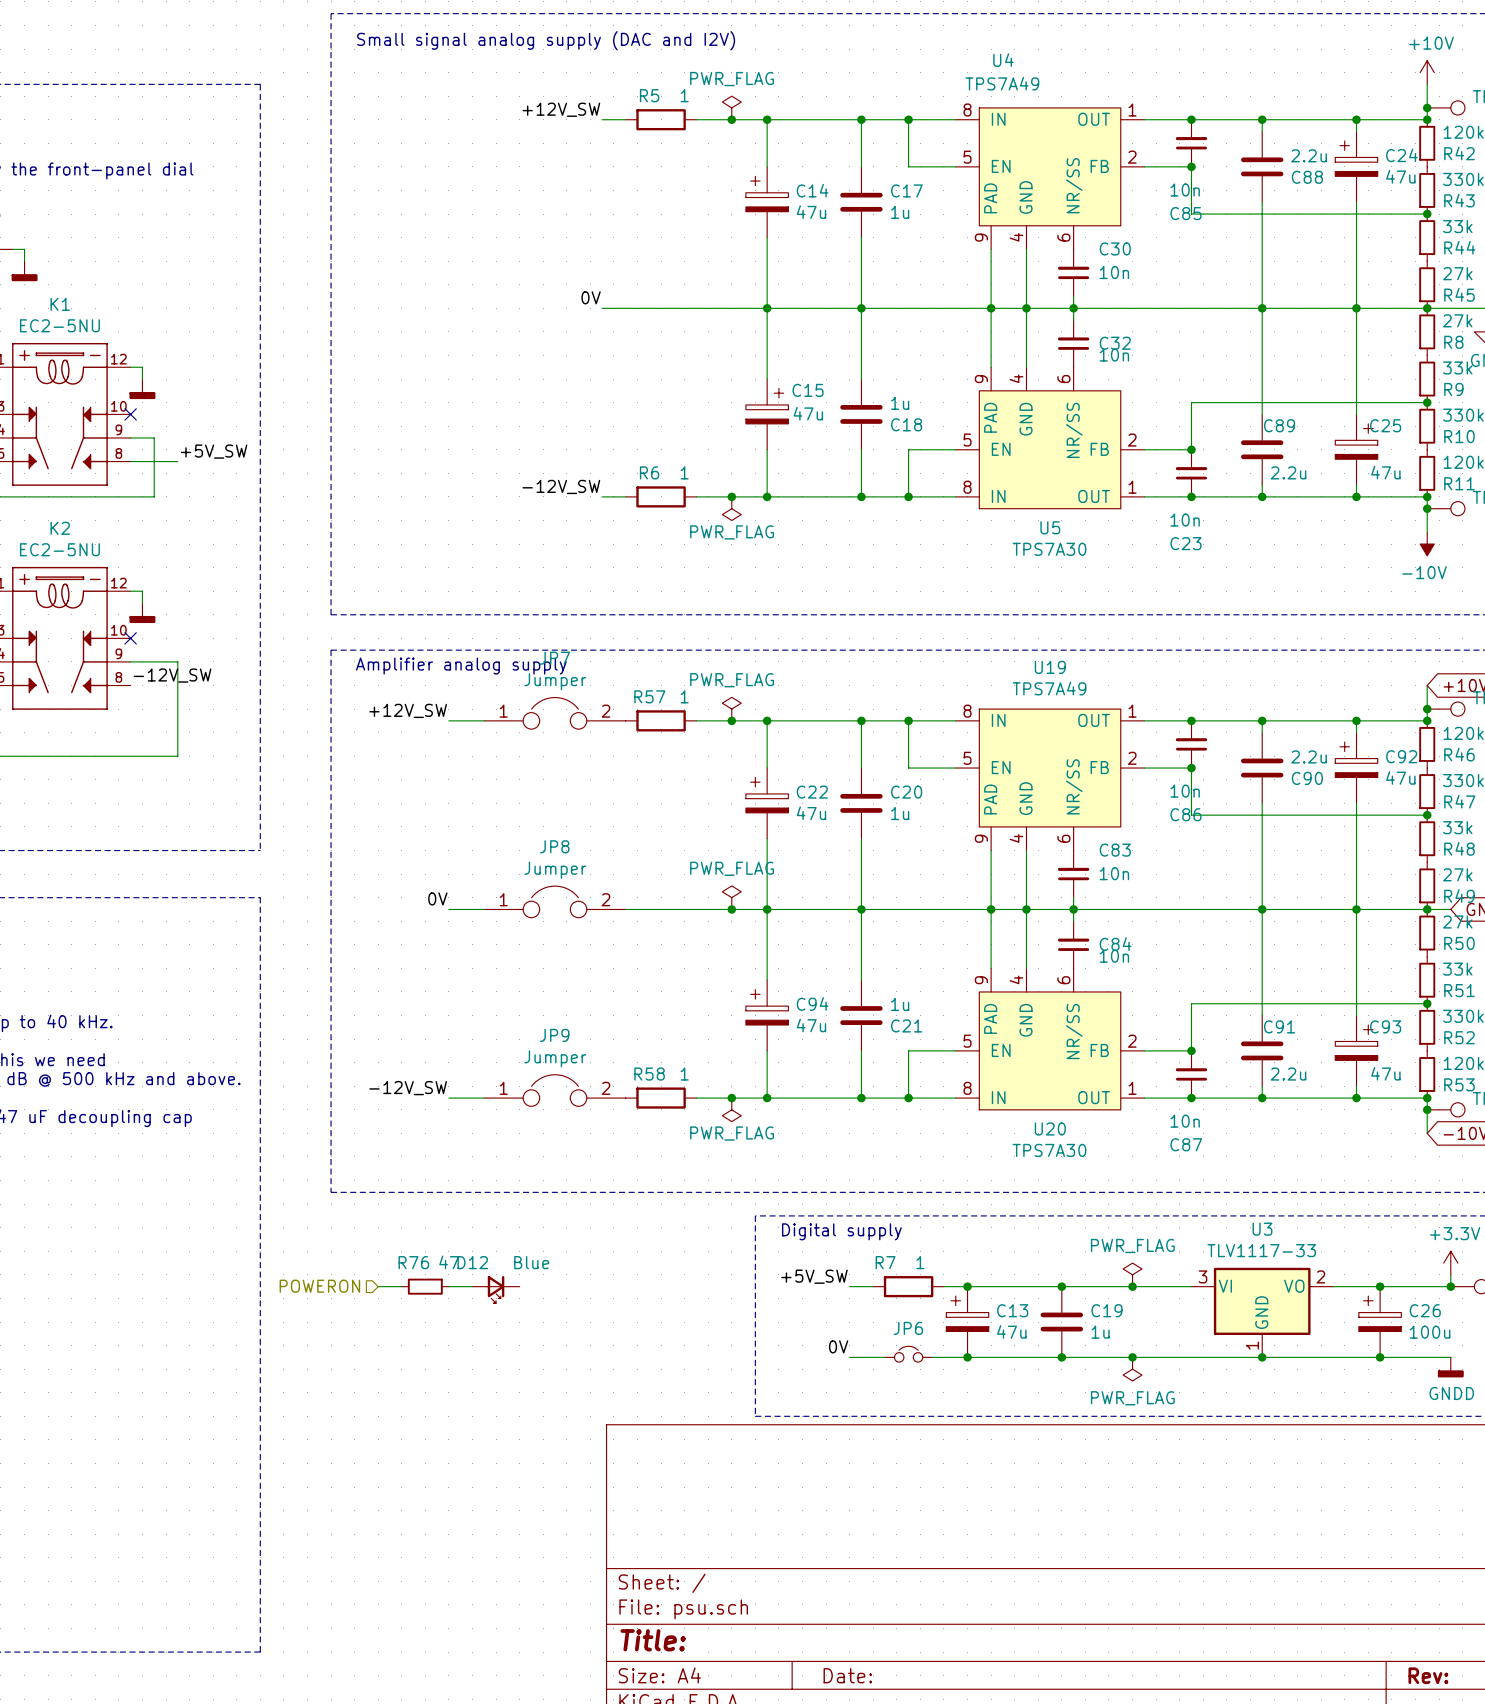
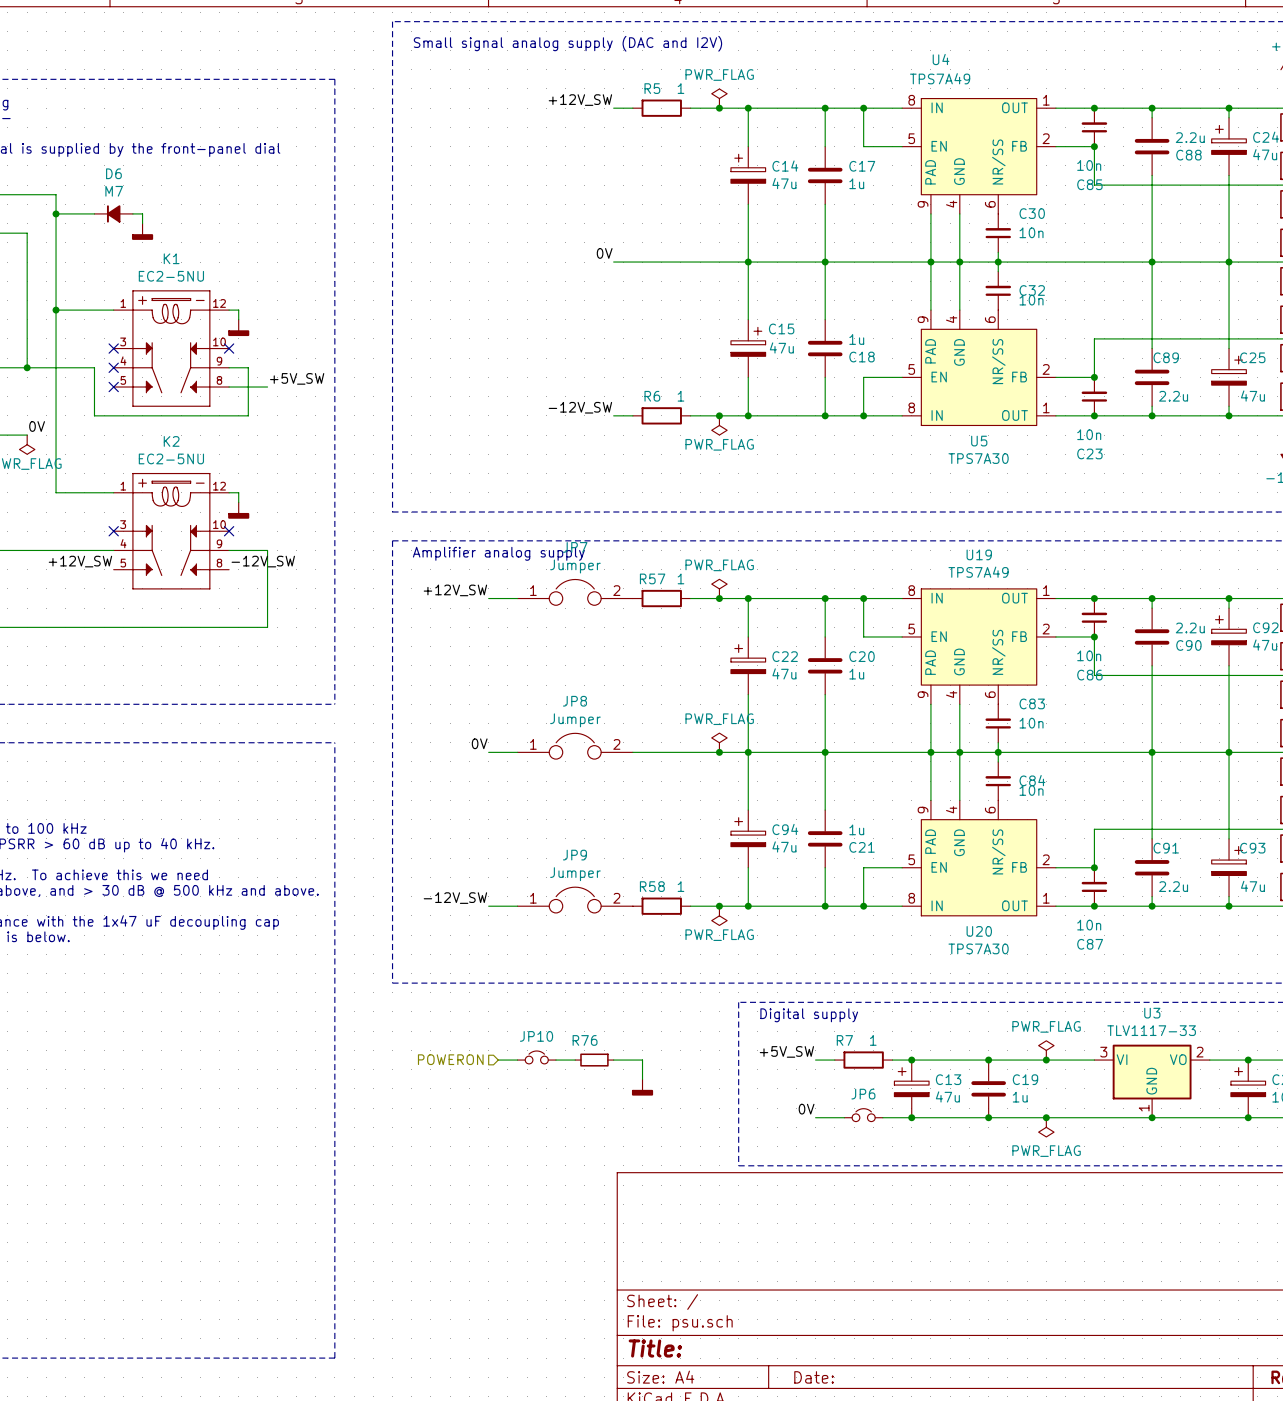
R76 value: 47 (449, 1262) -> none
JP10: none -> (536, 1057)
hierarchical label position: POWERON (319, 1286) -> POWERON (450, 1059)
wire: (378, 1286) (401, 1286) -> (555, 1060) (575, 1060)
R76 position: (425, 1286) -> (594, 1060)
wire: none -> (613, 1060) (642, 1060) (642, 1079)
D12: Blue (496, 1289) -> none
power symbol: none -> (642, 1087)

